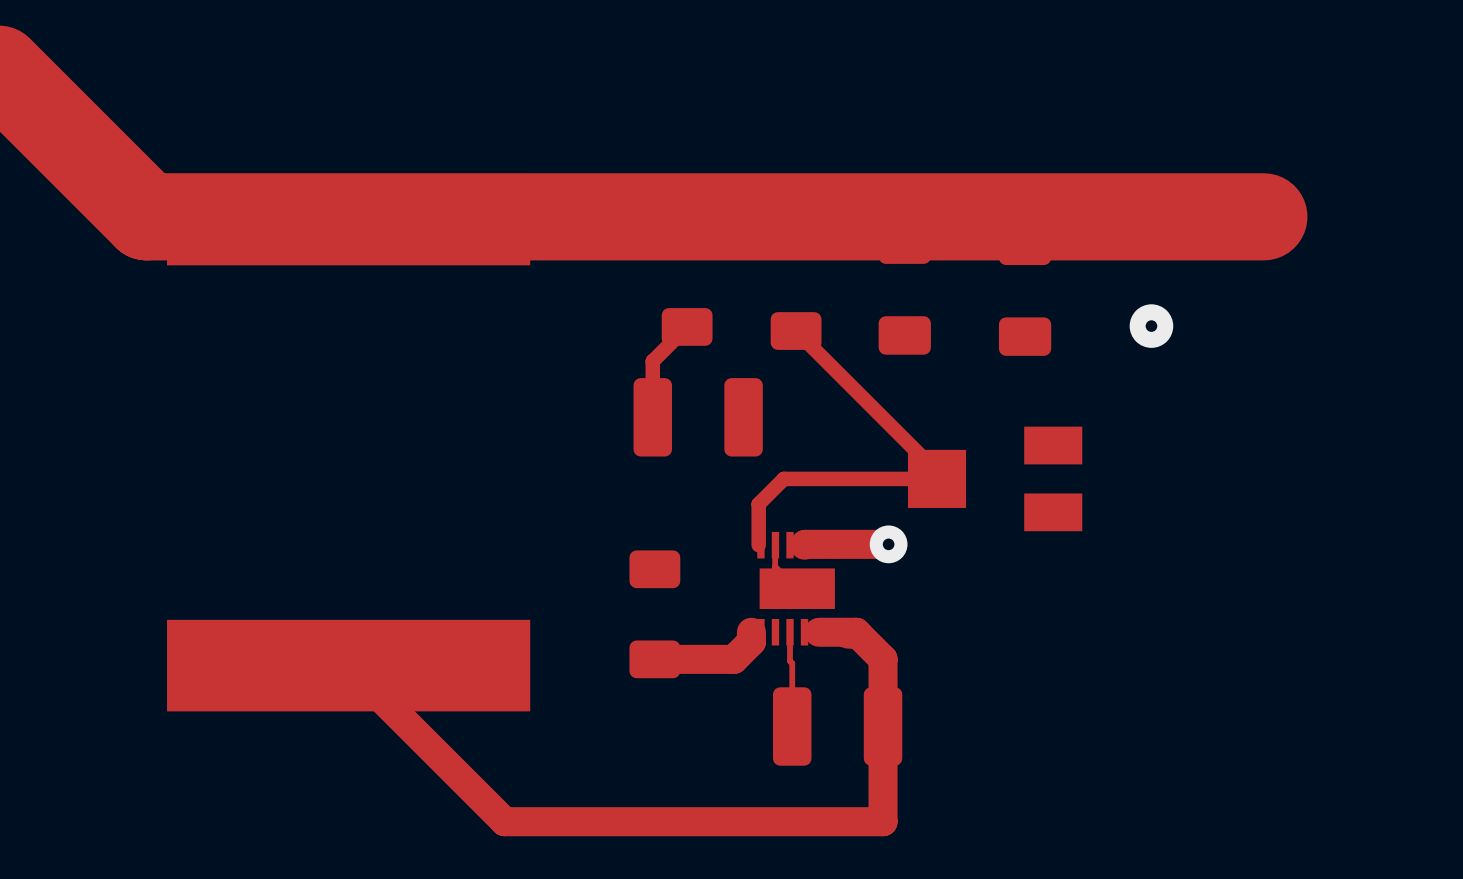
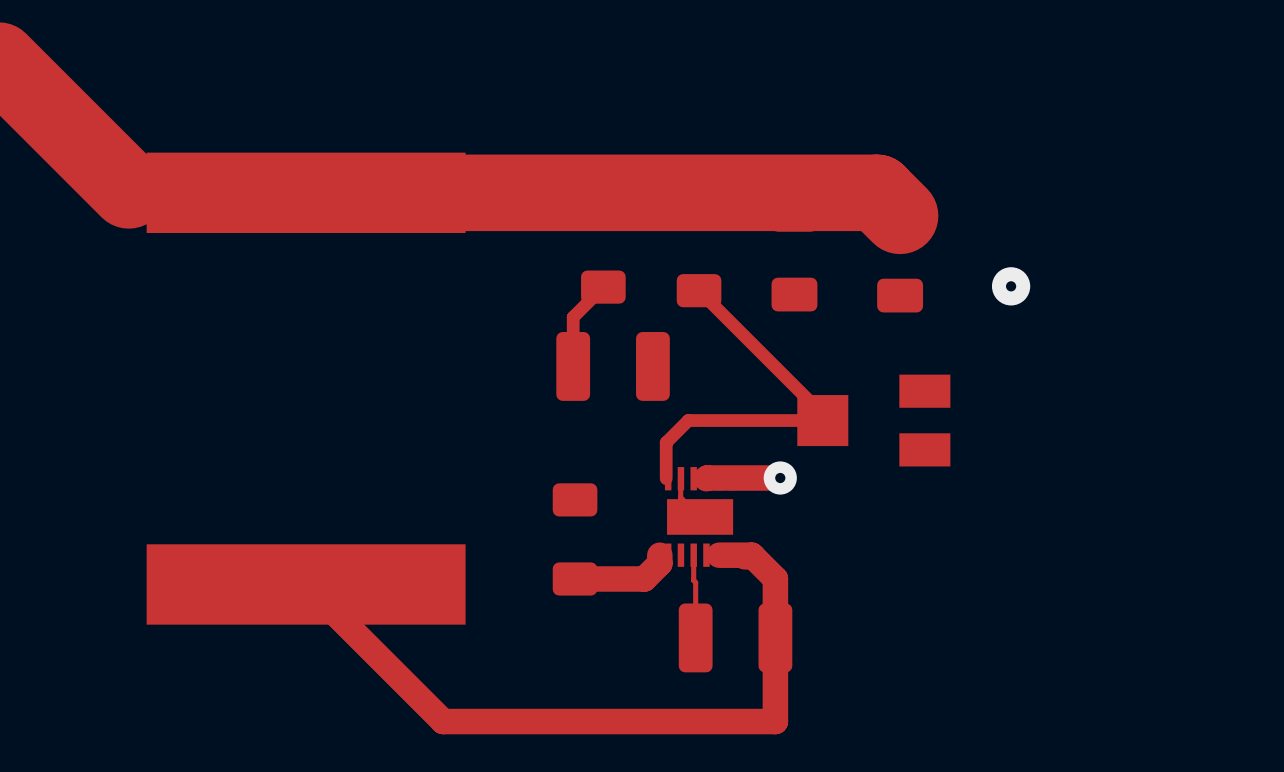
top track: (1263, 216) (146, 216) -> none
top track: none -> (306, 192) (877, 192) (900, 215)

